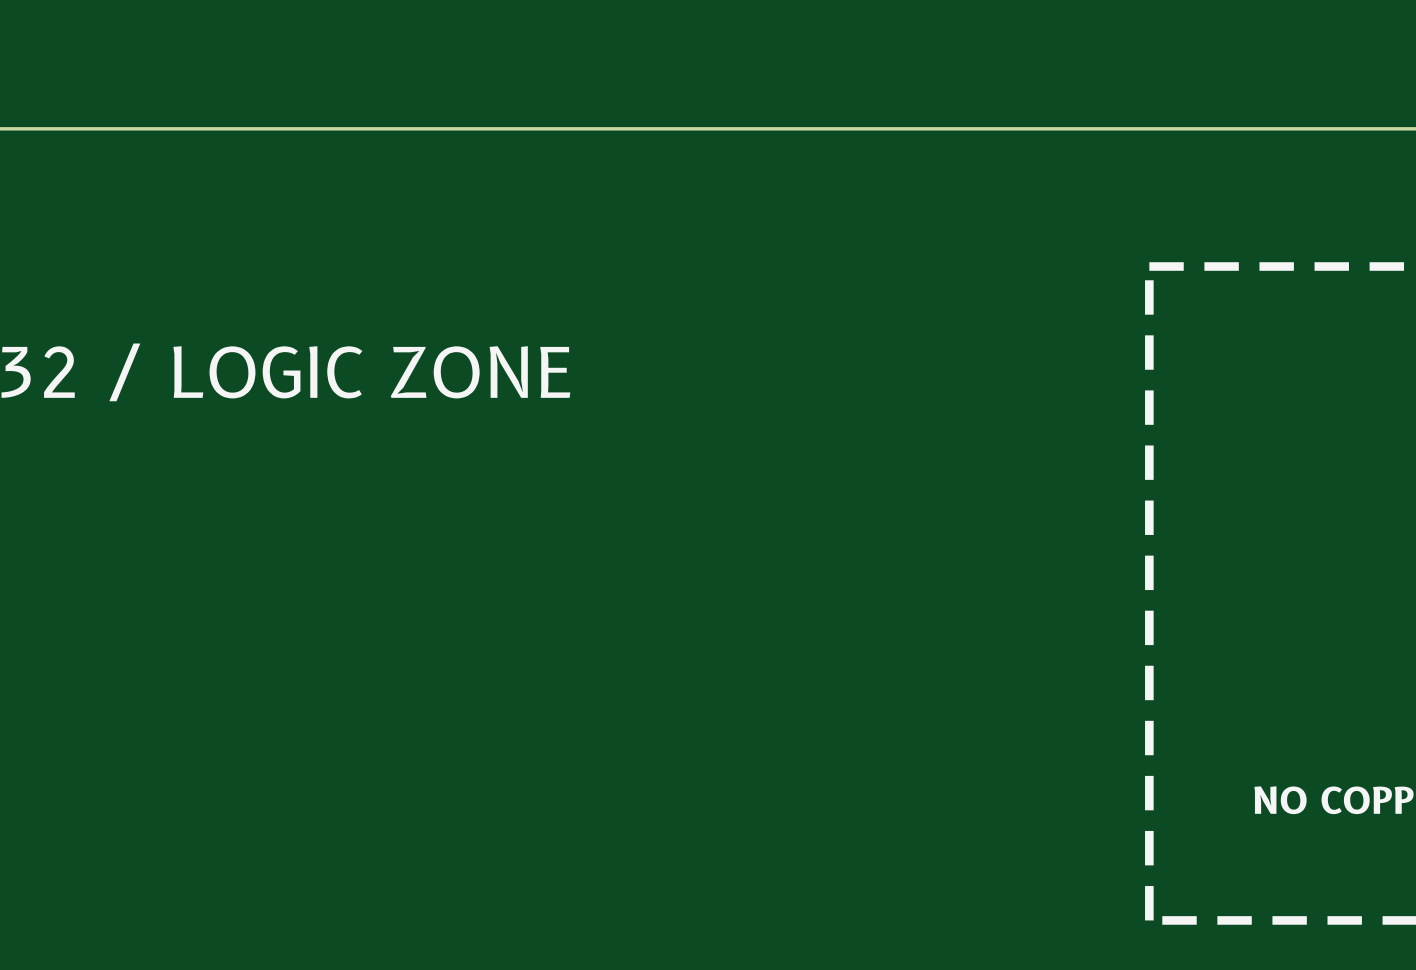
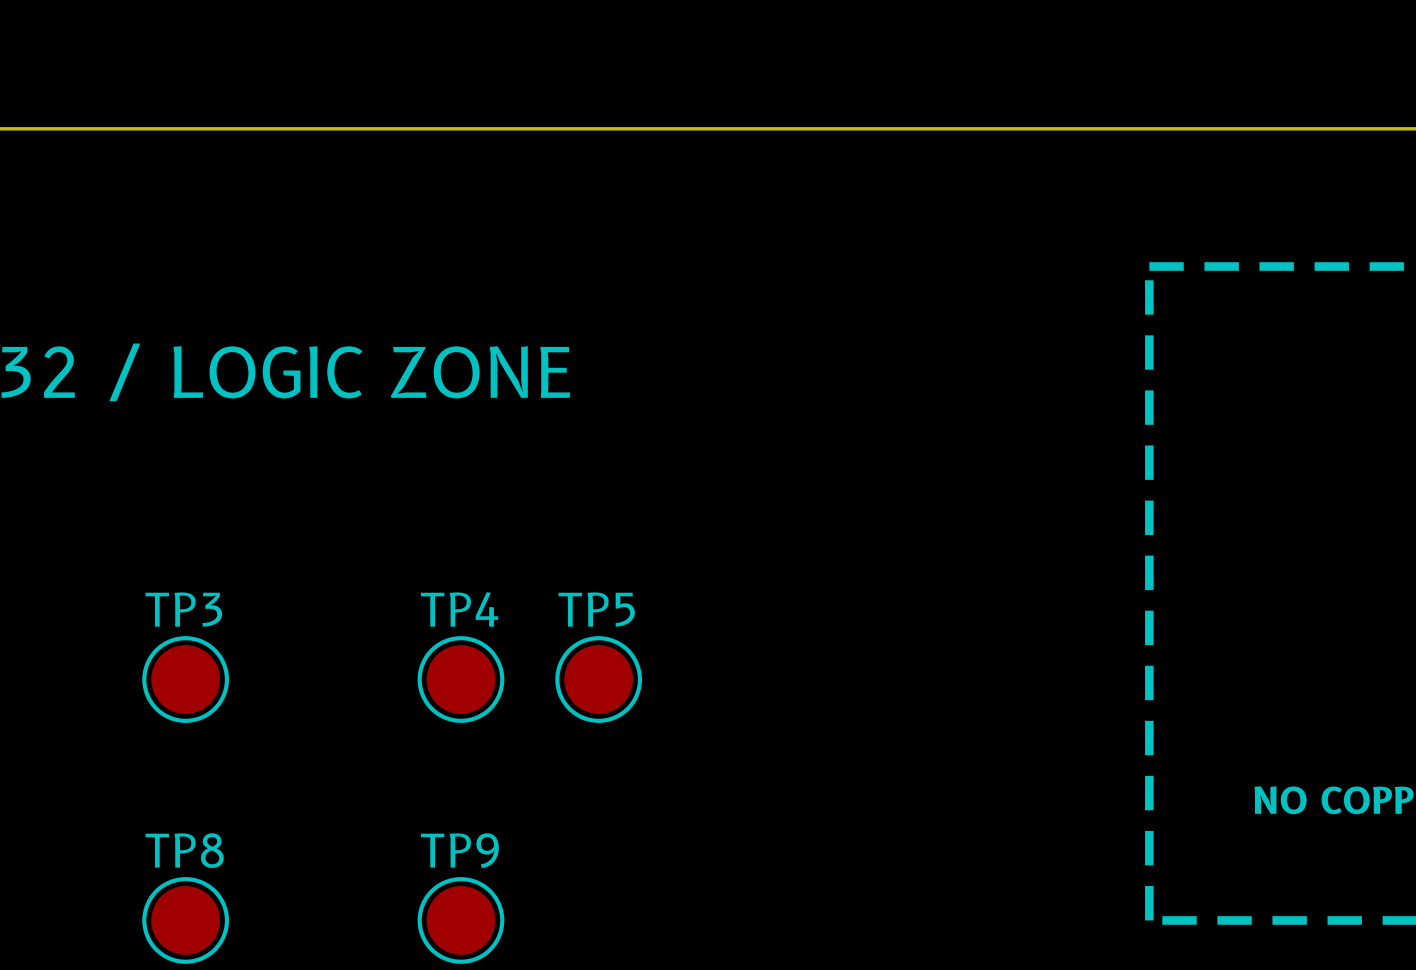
TP3: none -> (185, 679)
TP4: none -> (460, 679)
TP5: none -> (598, 679)
TP8: none -> (185, 920)
TP9: none -> (460, 920)

